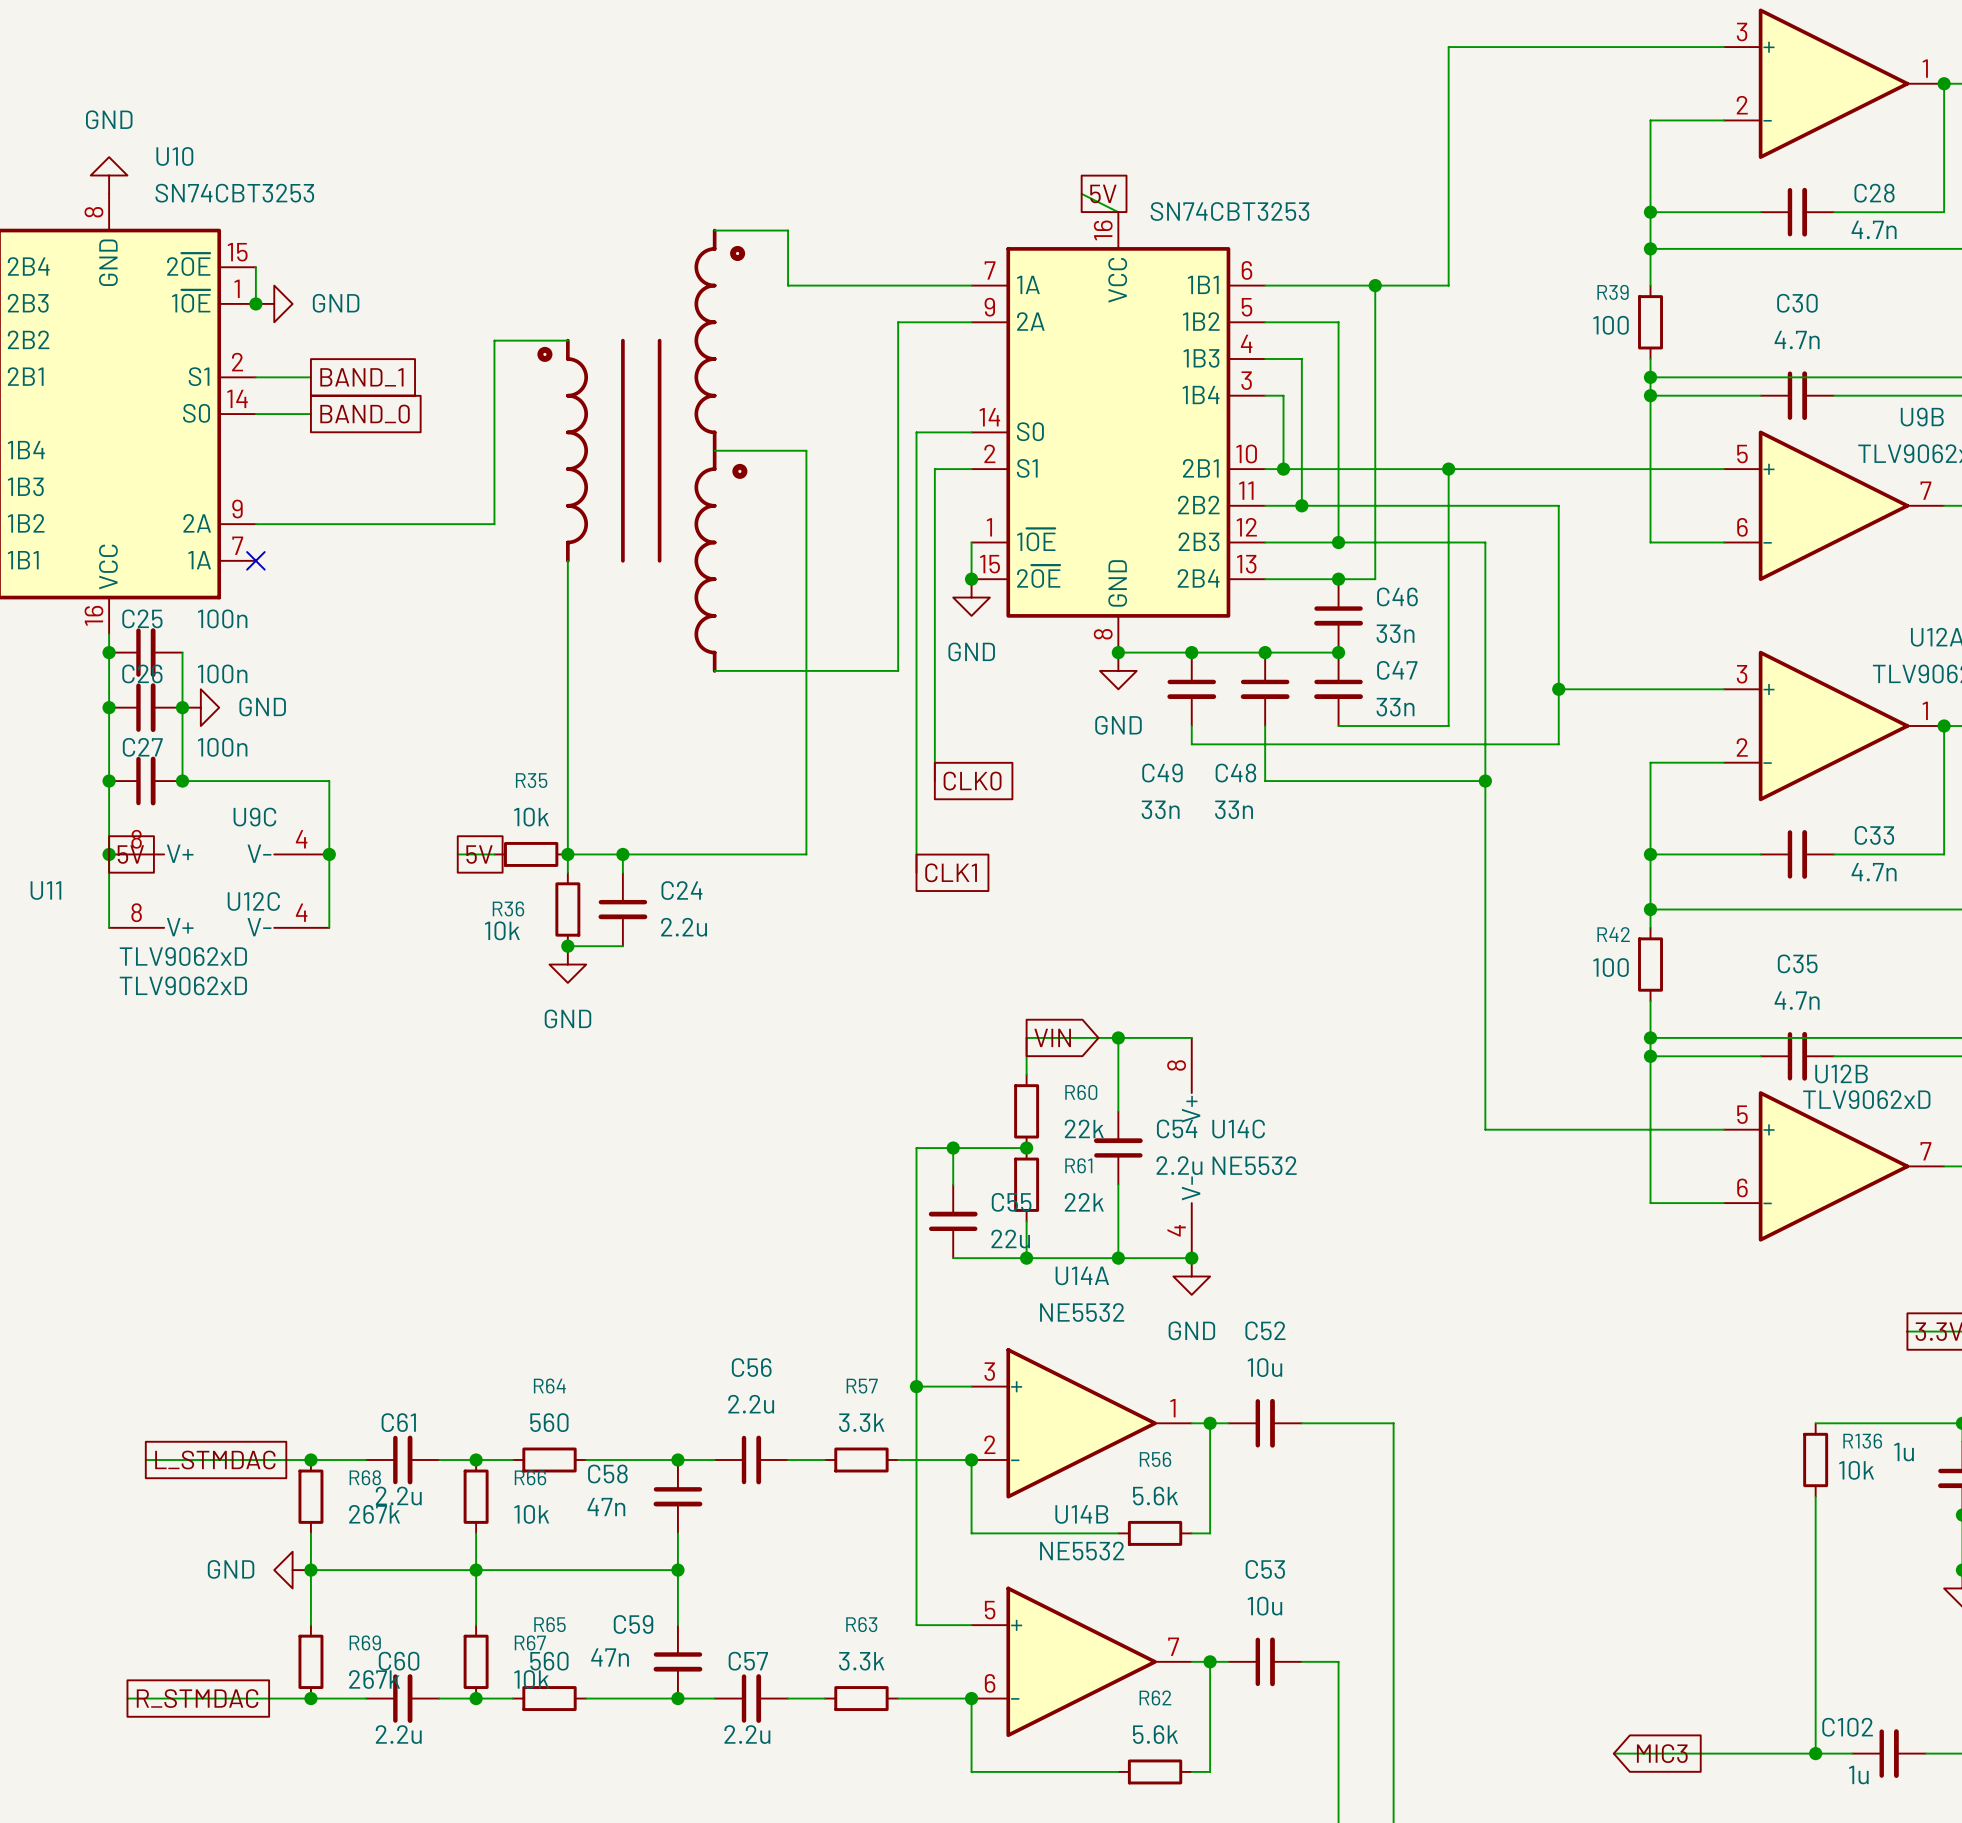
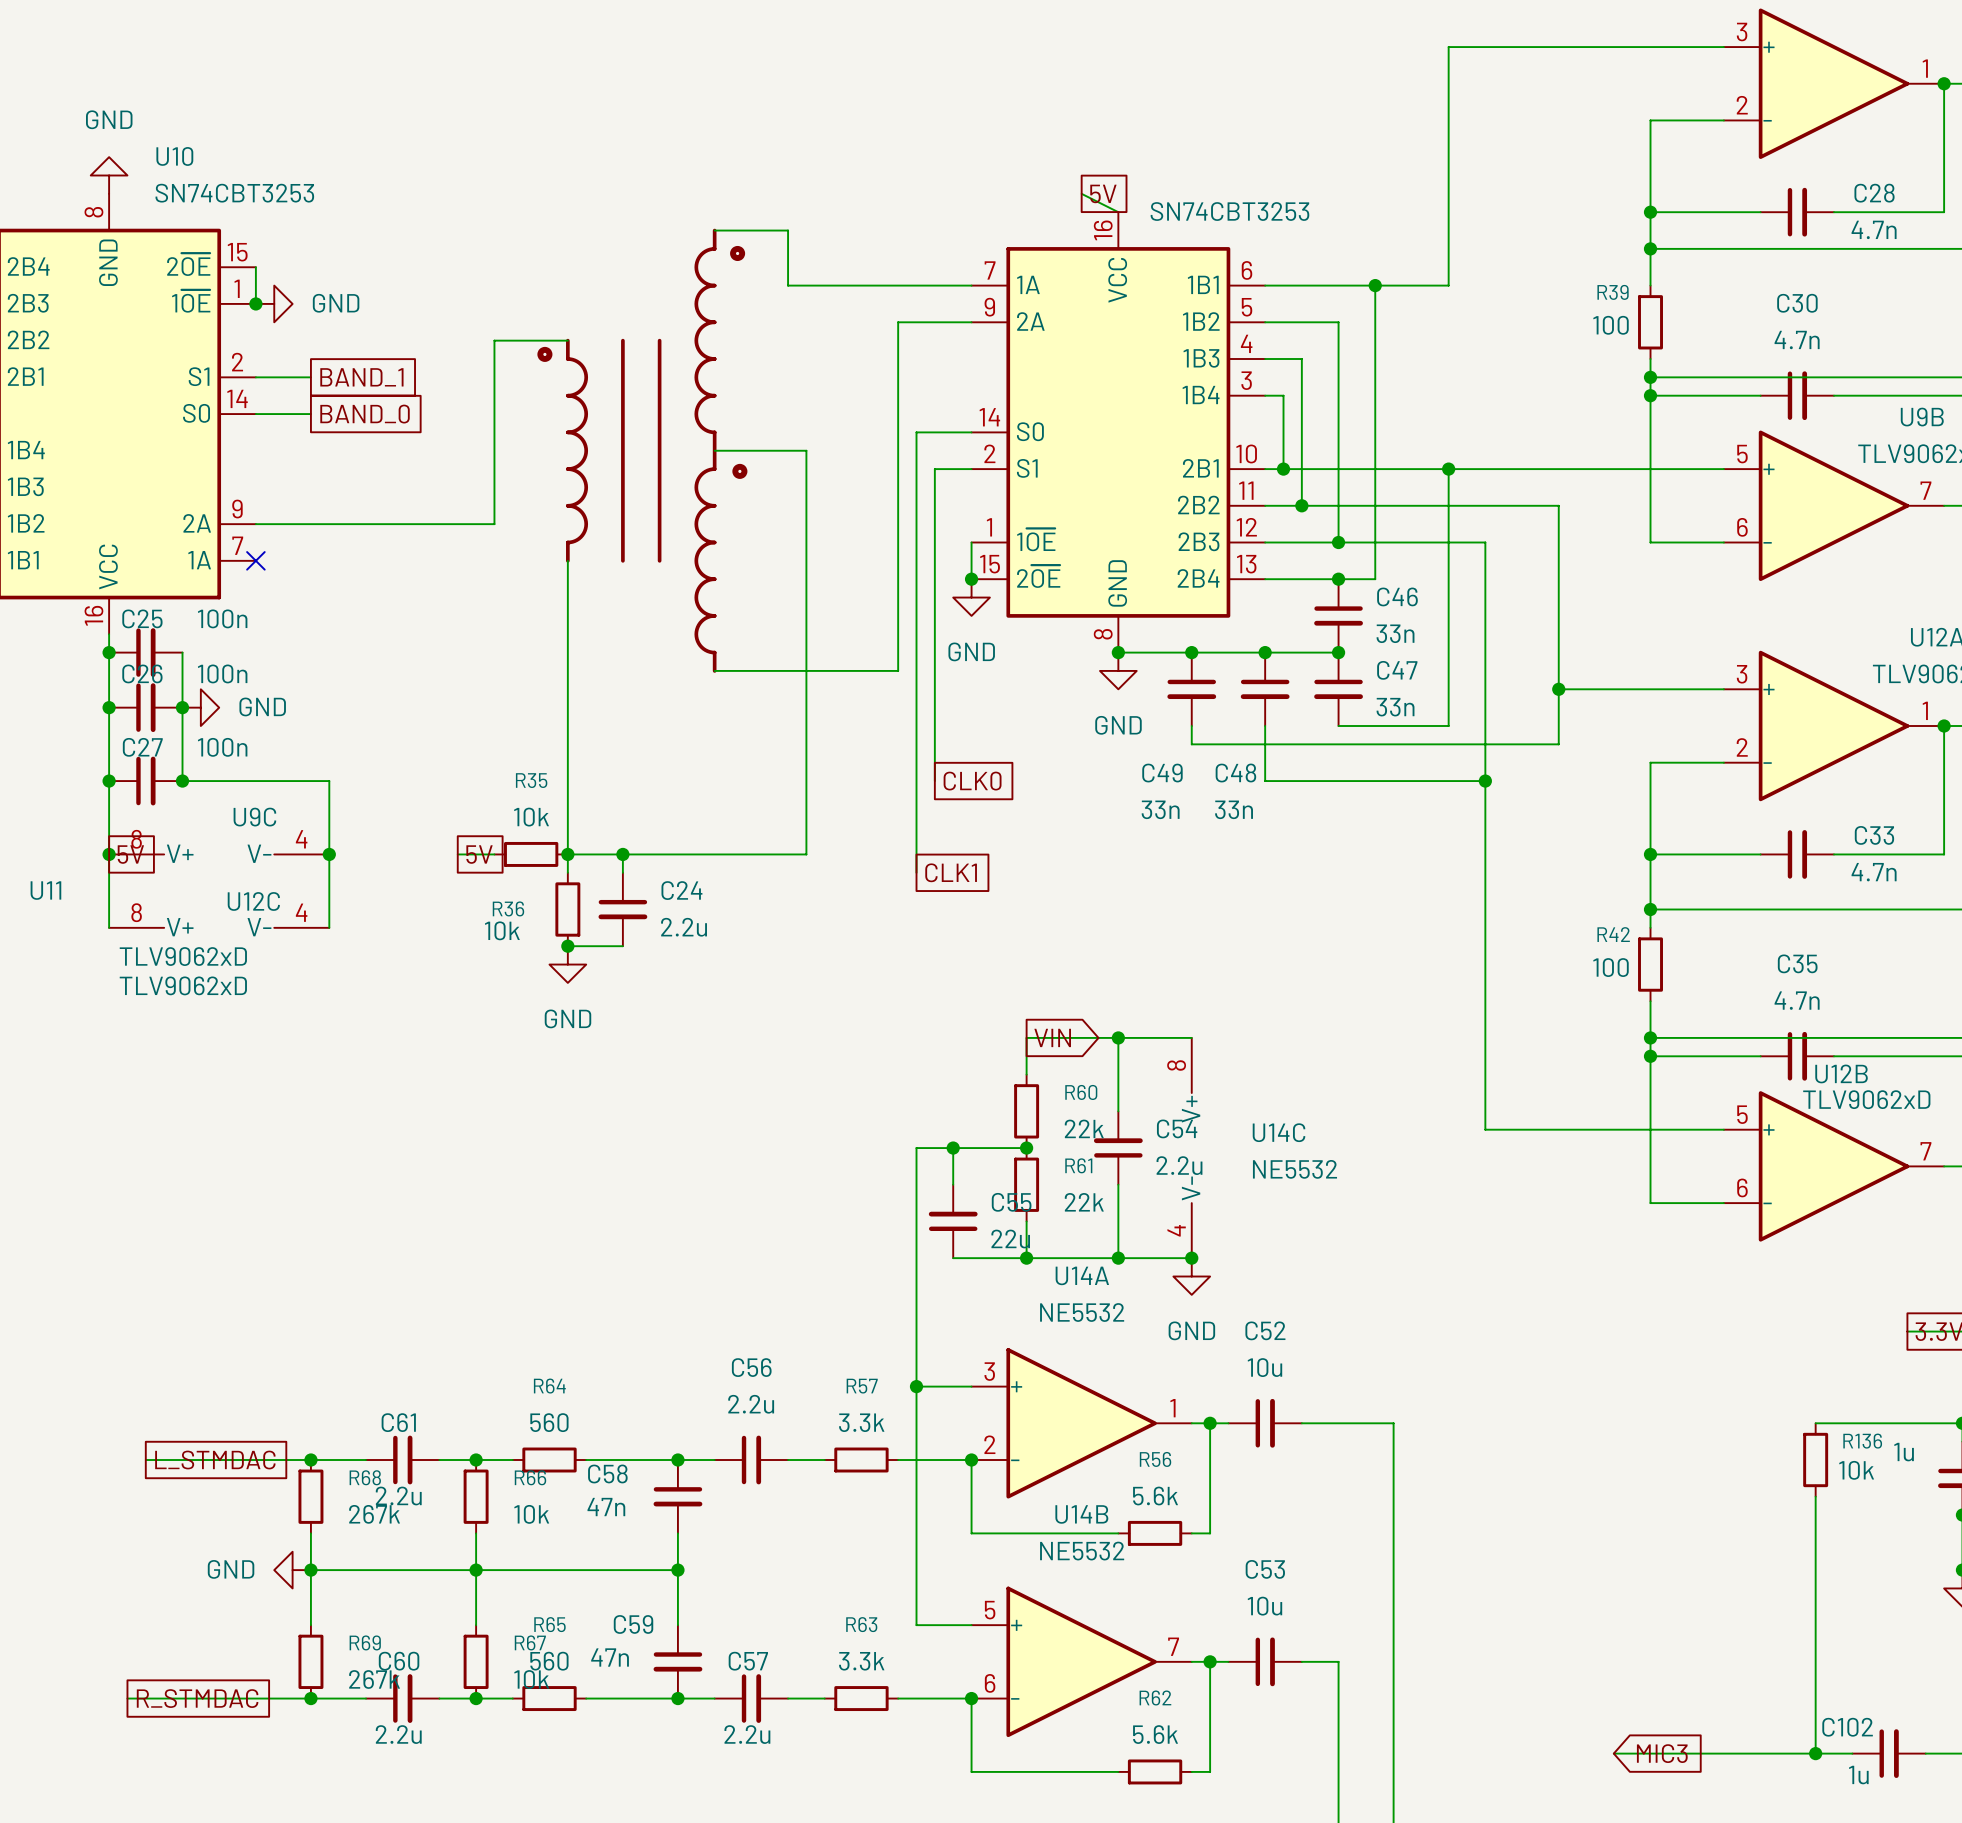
U14C name position: U14C (1238, 1129) -> U14C (1279, 1132)
U14C value position: NE5532 (1254, 1165) -> NE5532 (1294, 1169)

